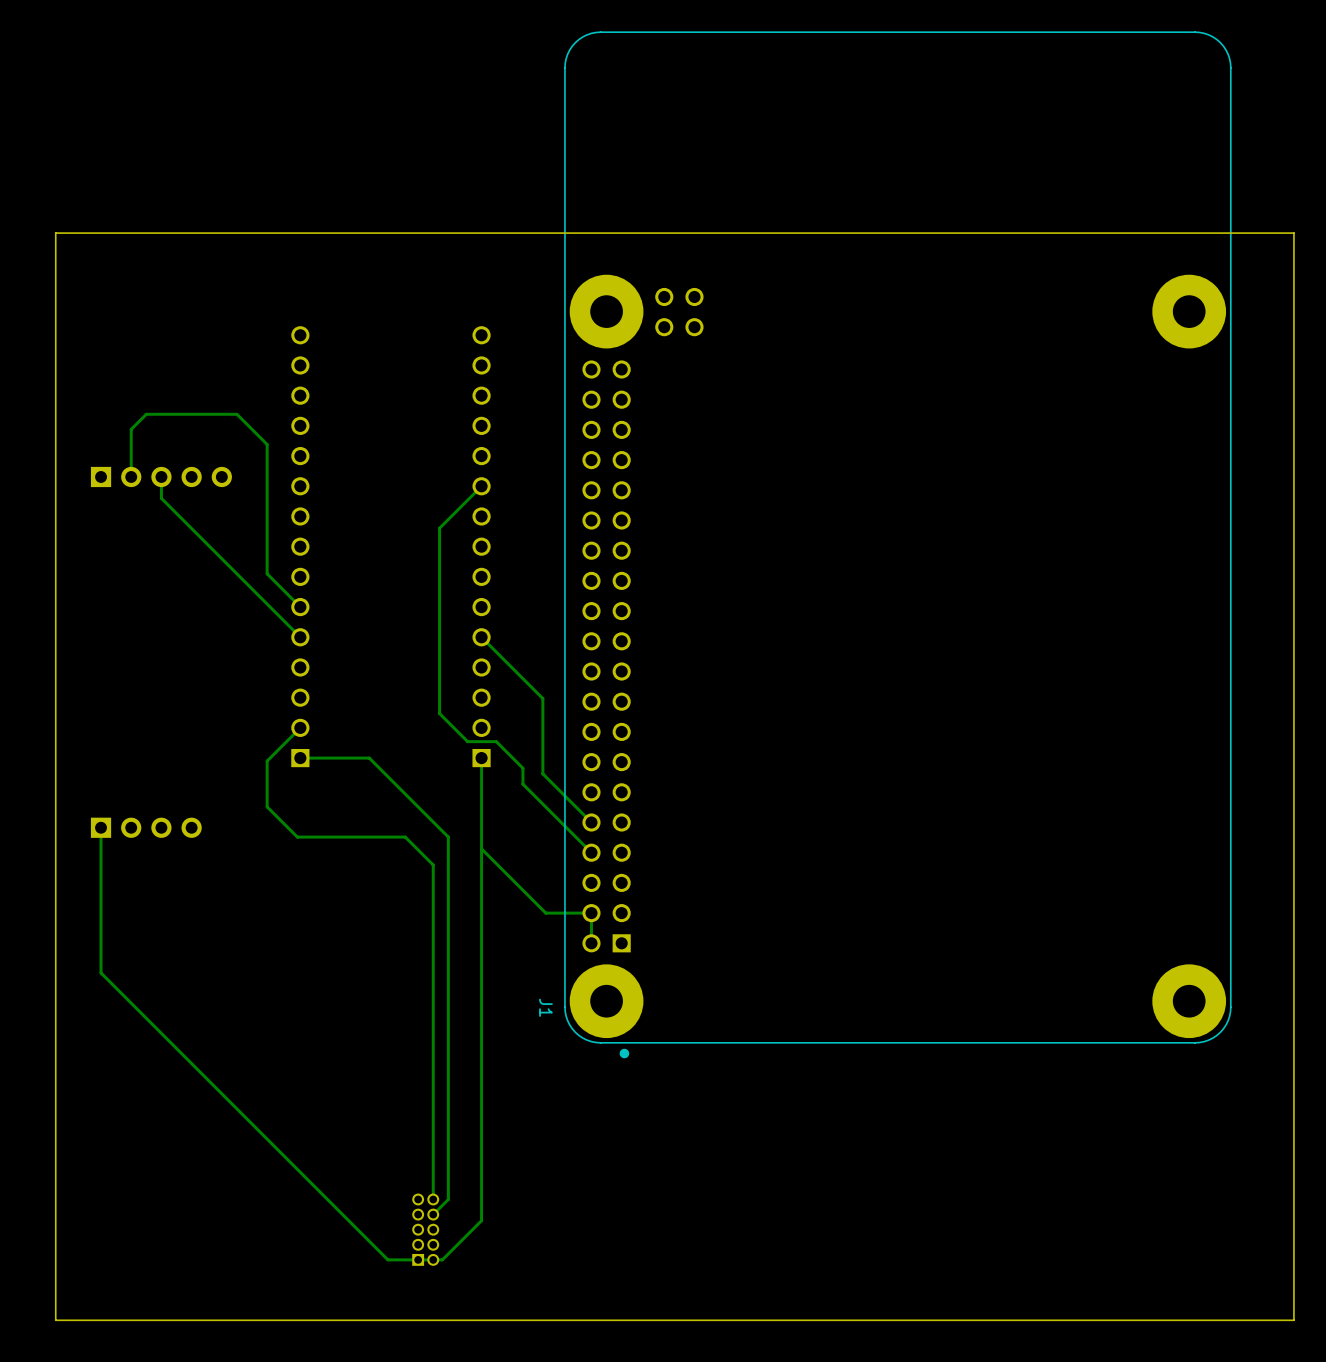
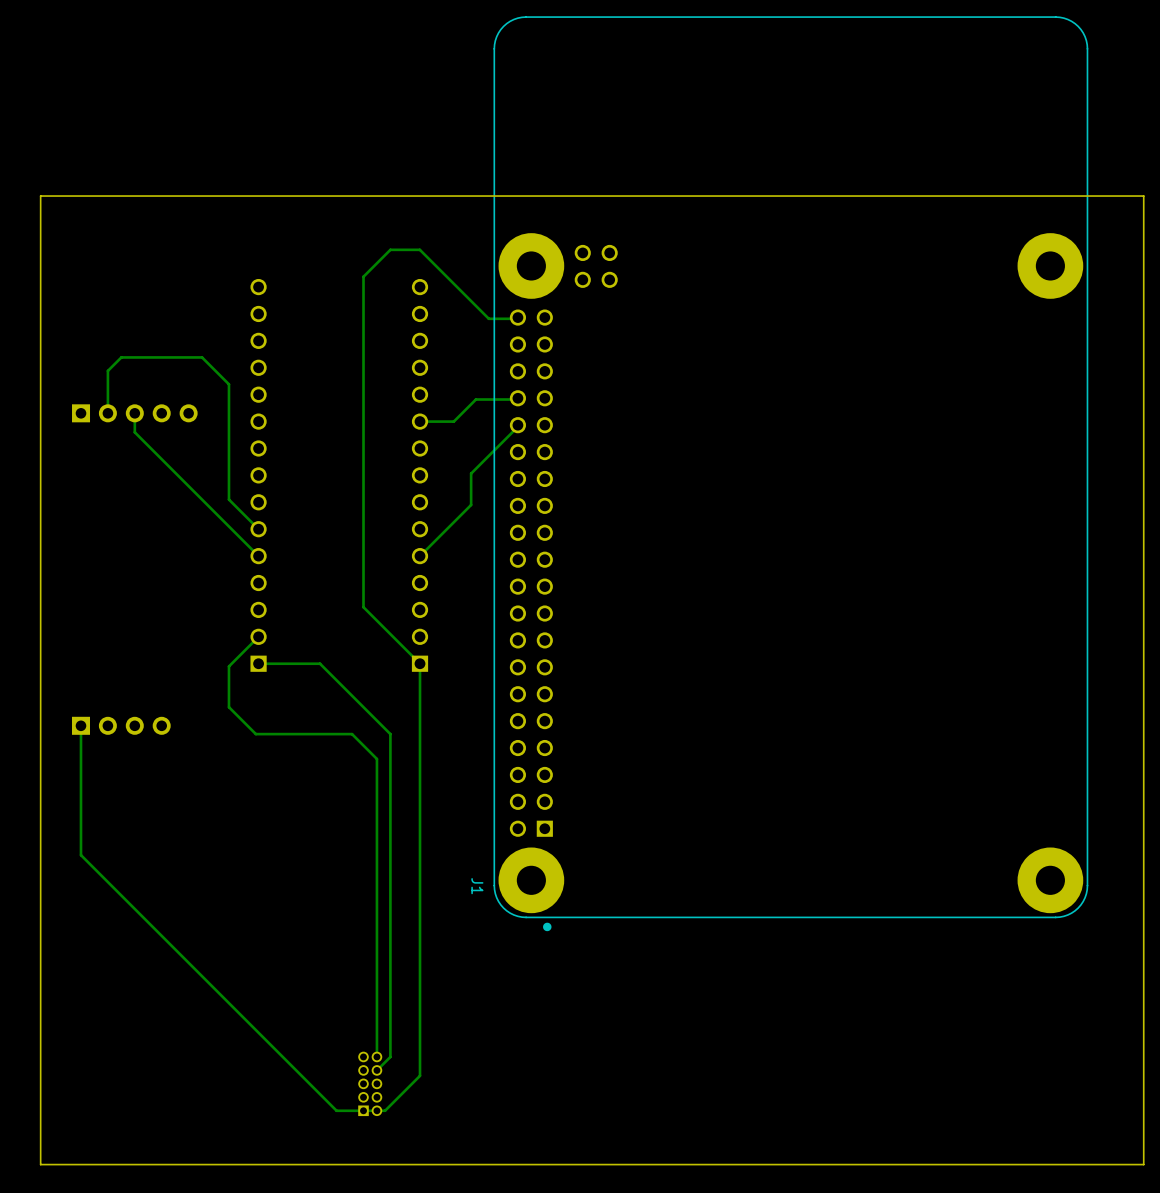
bottom track: none -> (518, 318) (488, 318) (419, 249) (390, 249) (363, 276) (363, 607) (420, 663)
bottom track: (481, 486) (439, 528) (439, 713) (467, 741) (496, 741) (522, 768) (522, 784) (591, 852) -> (420, 421) (453, 421) (475, 399) (518, 399)
bottom track: (481, 637) (542, 698) (542, 773) (591, 822) -> (420, 556) (471, 504) (471, 473) (518, 426)
bottom track: (481, 848) (545, 913) (591, 913) (591, 943) -> none

